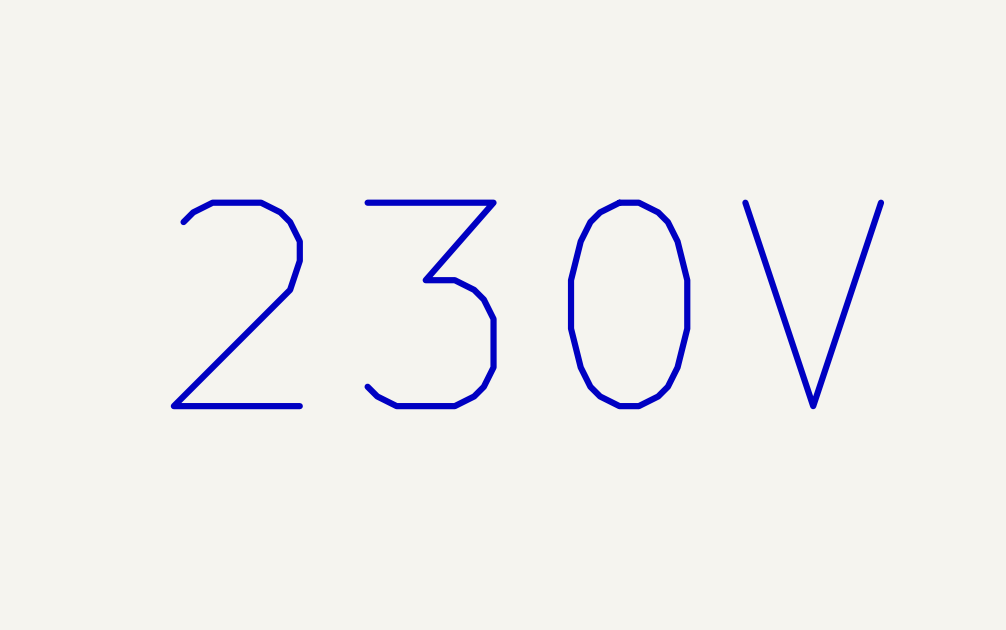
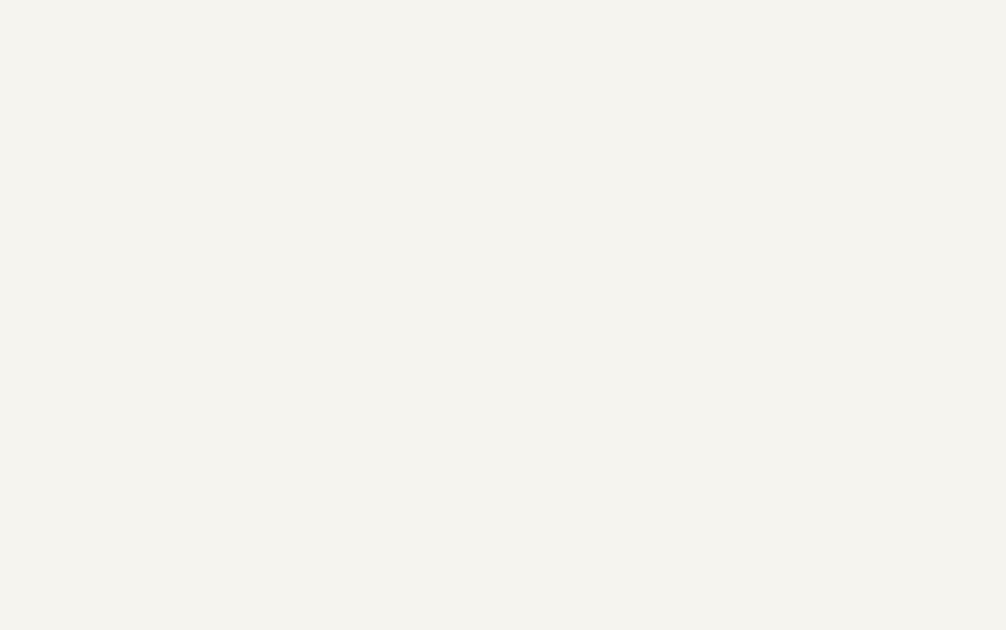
text: 230V (527, 304) -> none

